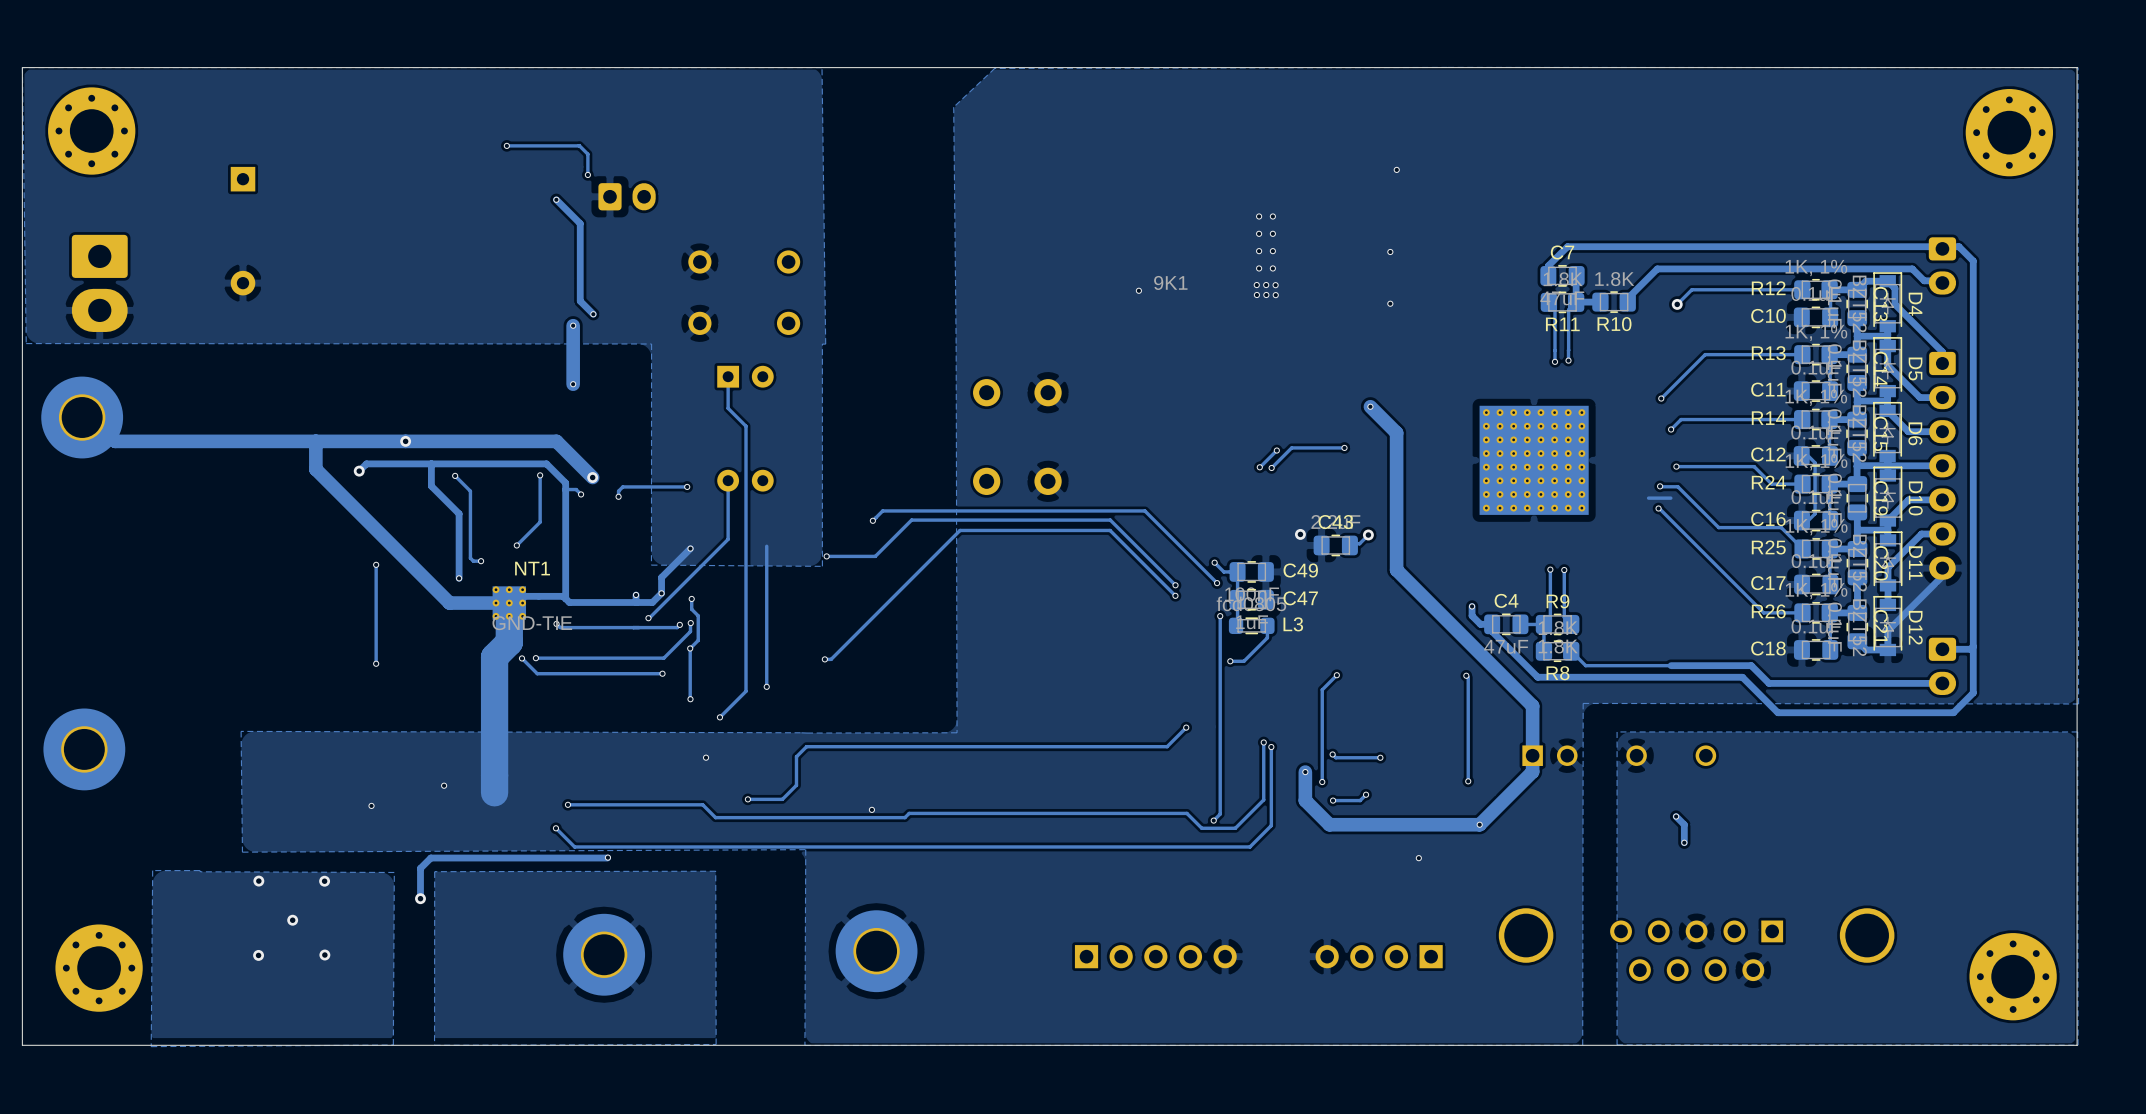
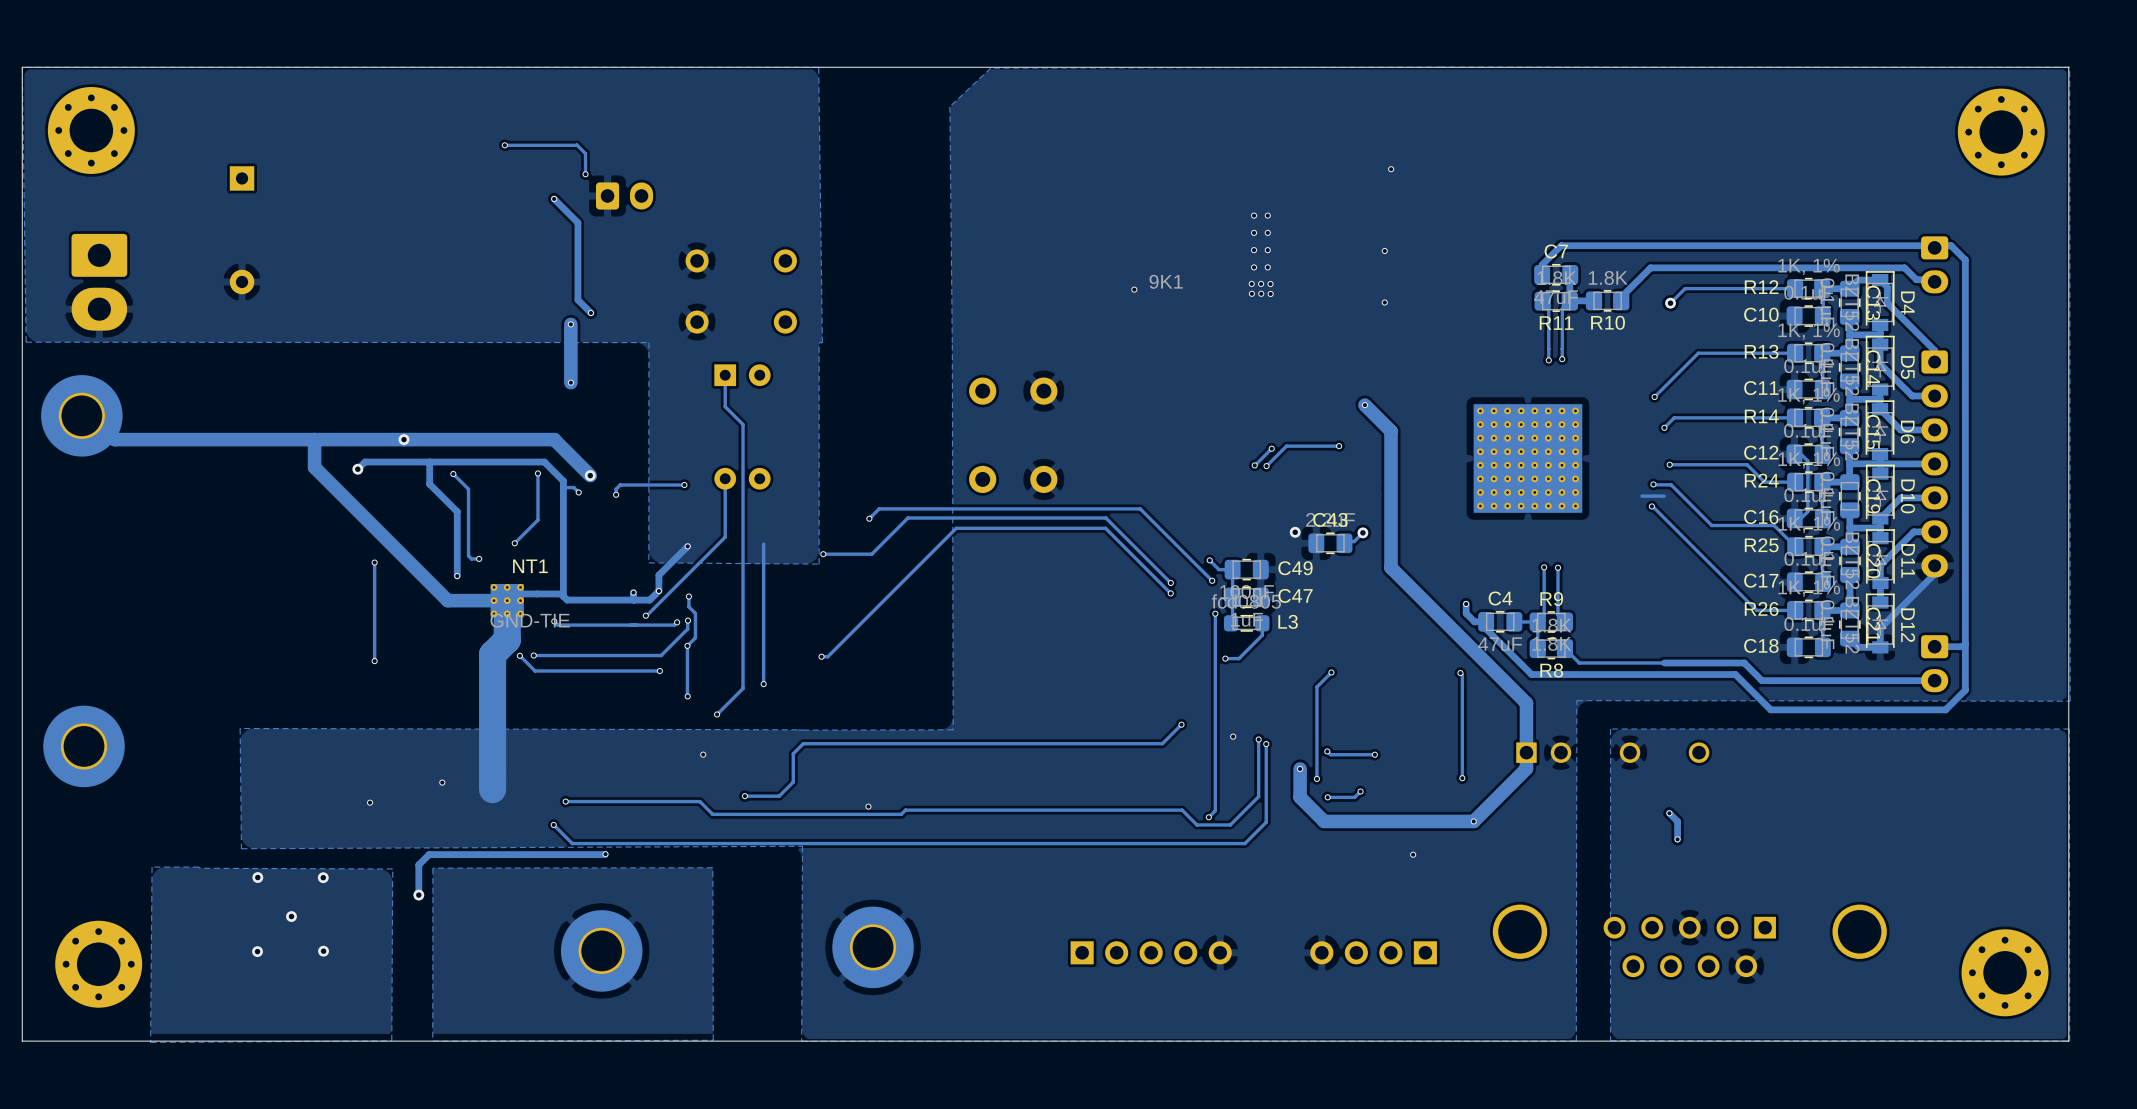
via: none -> (1233, 736)

